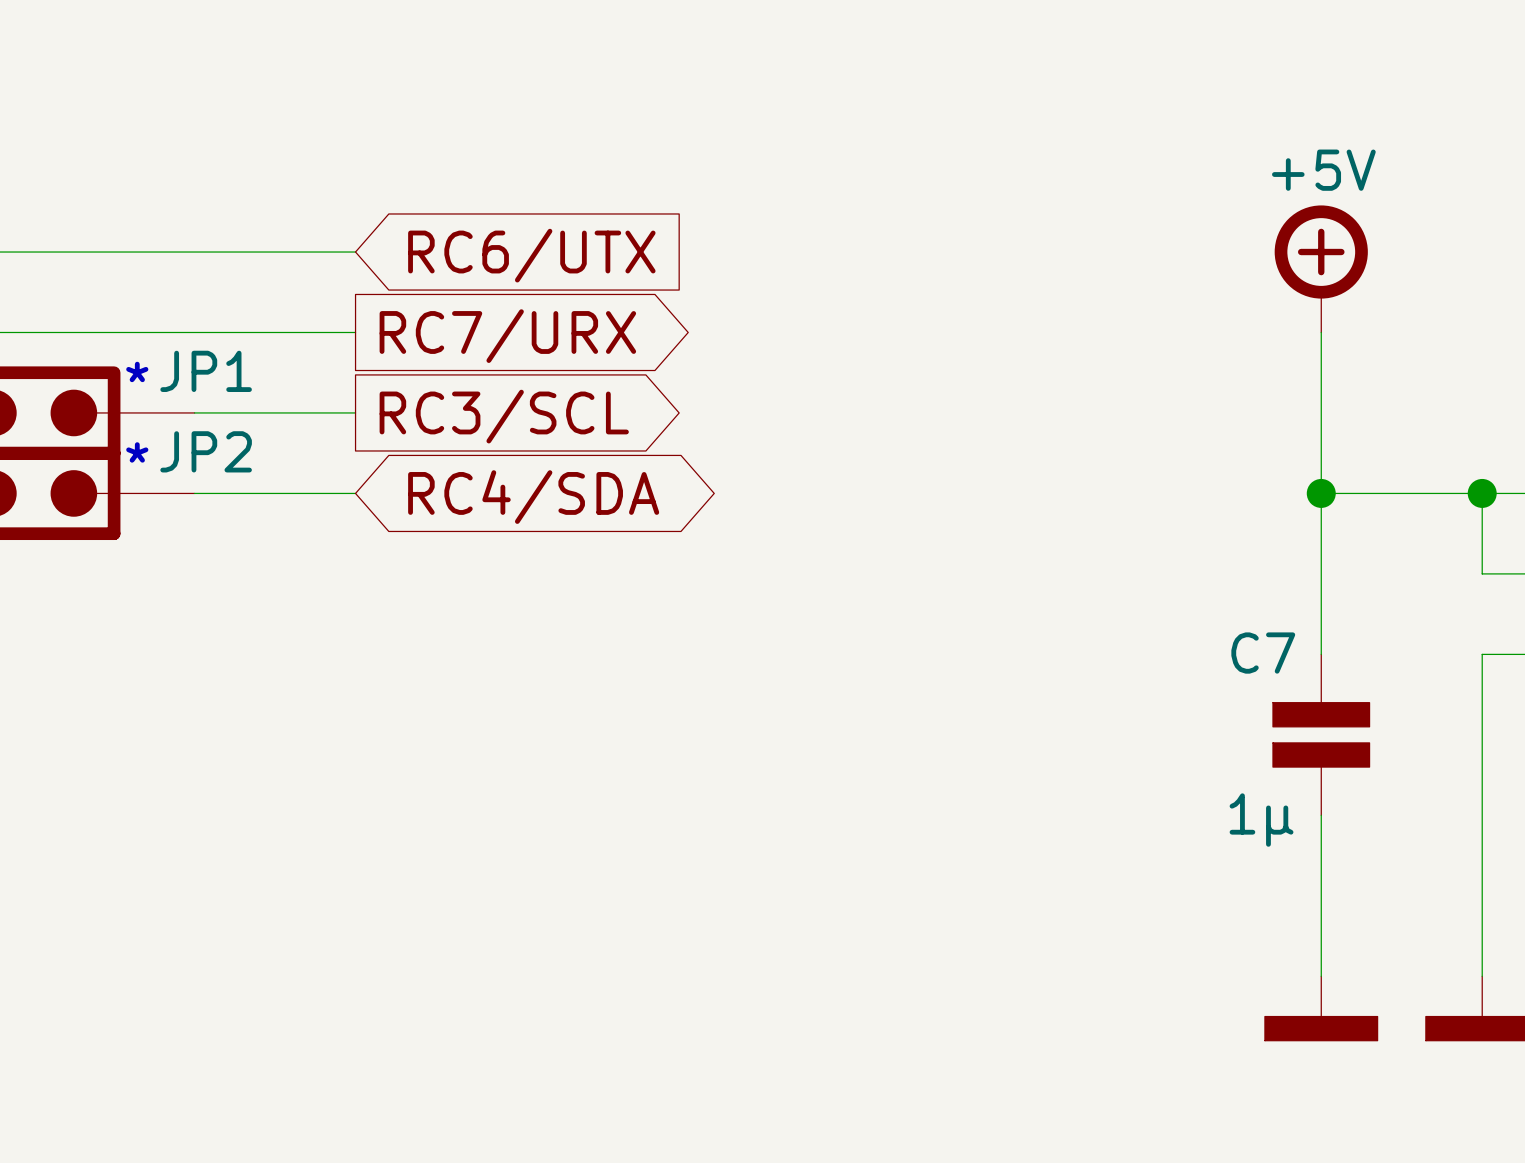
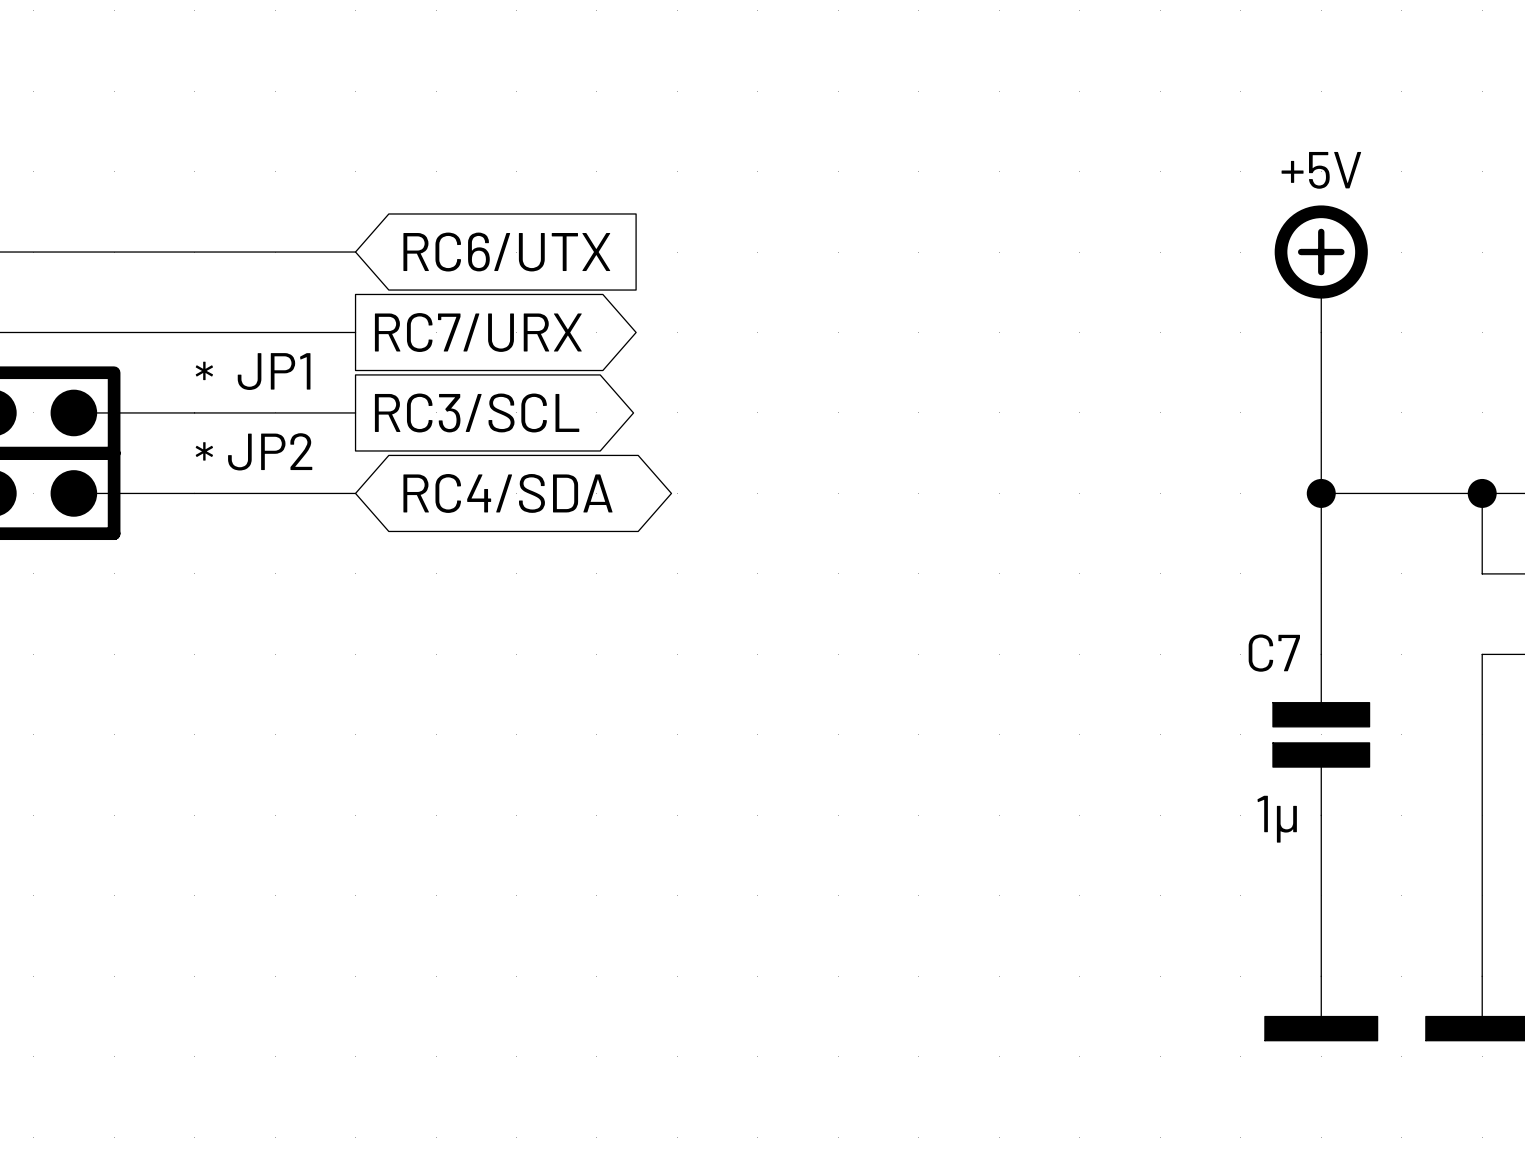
text: * (137, 371) -> none
text: none -> * (204, 370)
JP1 name position: JP1 (206, 371) -> JP1 (274, 371)
JP2 name position: JP2 (206, 451) -> JP2 (270, 451)
text: * (137, 452) -> none
text: none -> * (204, 451)

